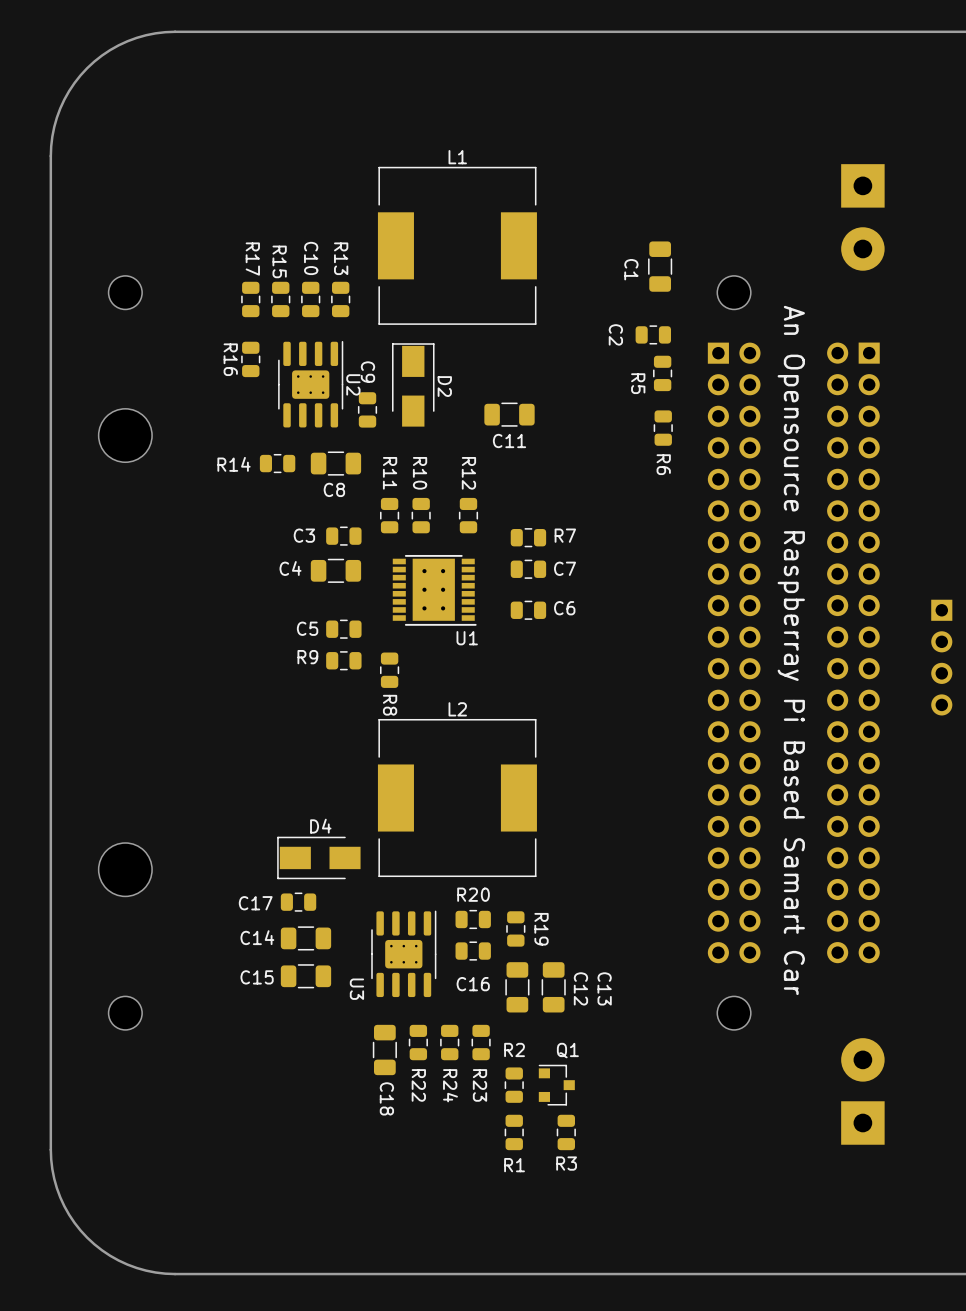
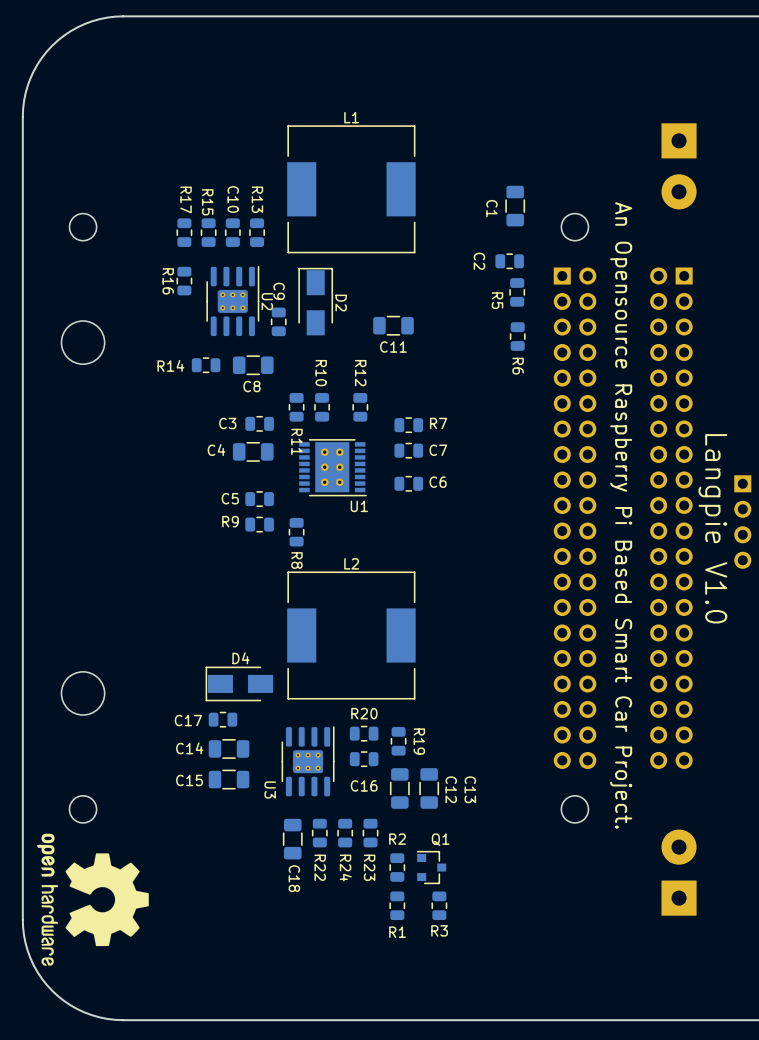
R11 name position: R11 (390, 473) -> R11 (296, 441)
drawing: none -> [698, 434, 728, 624]
text: An Opensource Raspberray Pi Based Samart Car (791, 650) -> An Opensource Raspberry Pi Based Smart Car Project. (621, 515)
drawing: none -> [37, 833, 149, 966]

